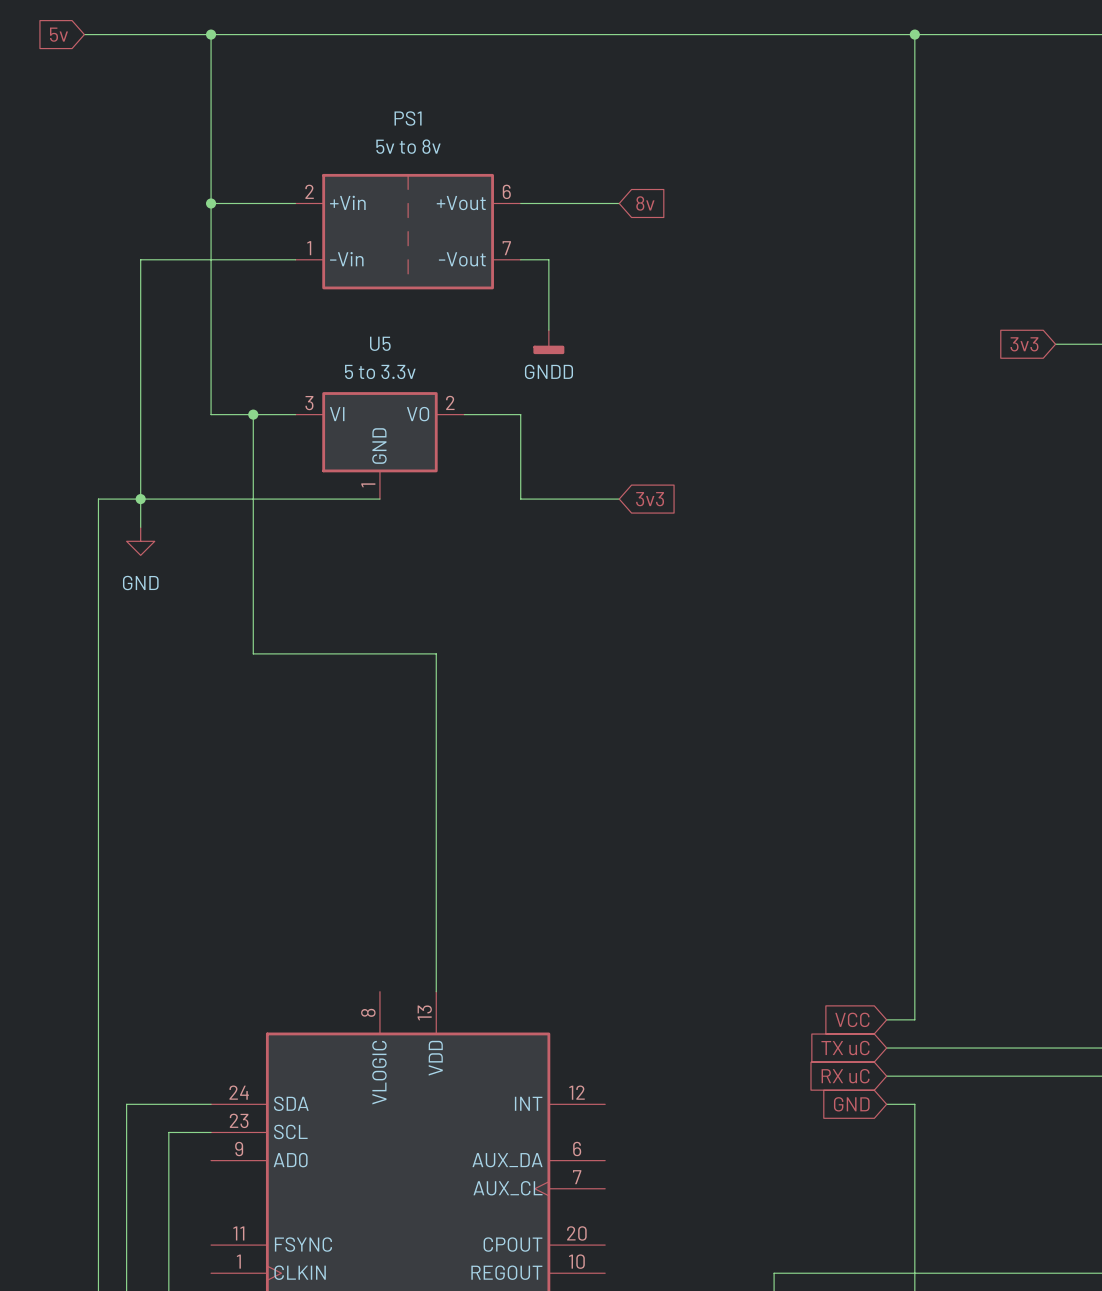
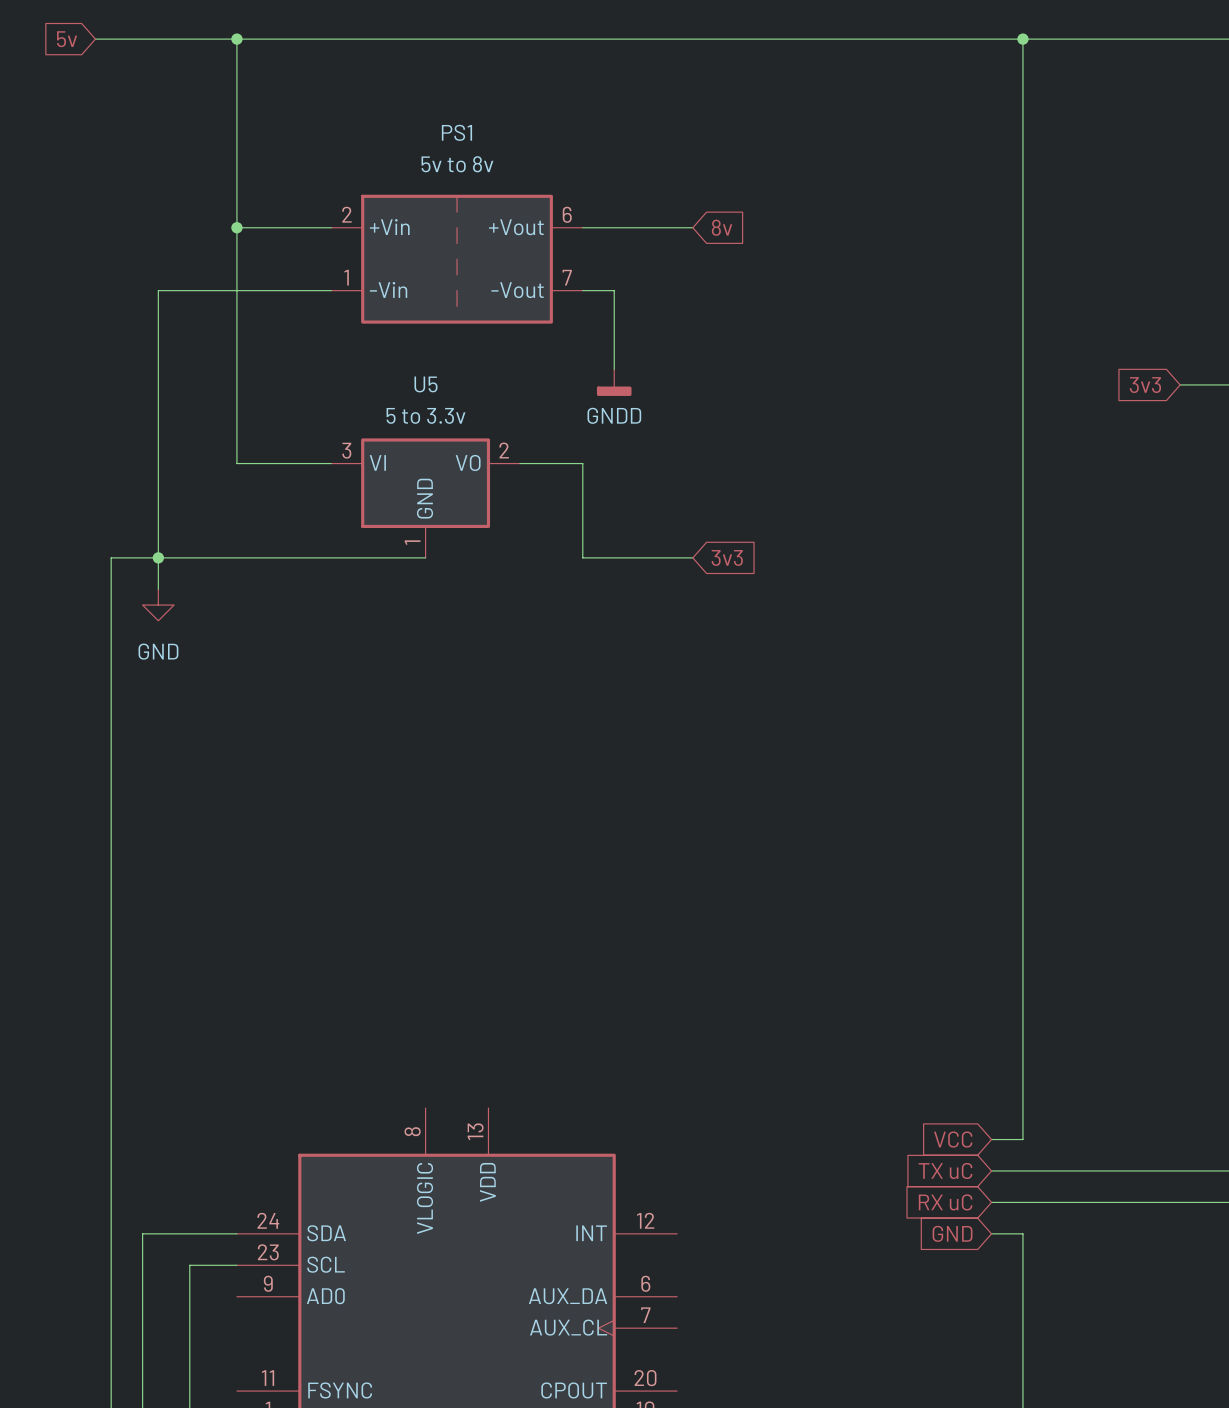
wire: (253, 414) (253, 653) (436, 653) (436, 991) -> none
junction: (253, 414) -> none

